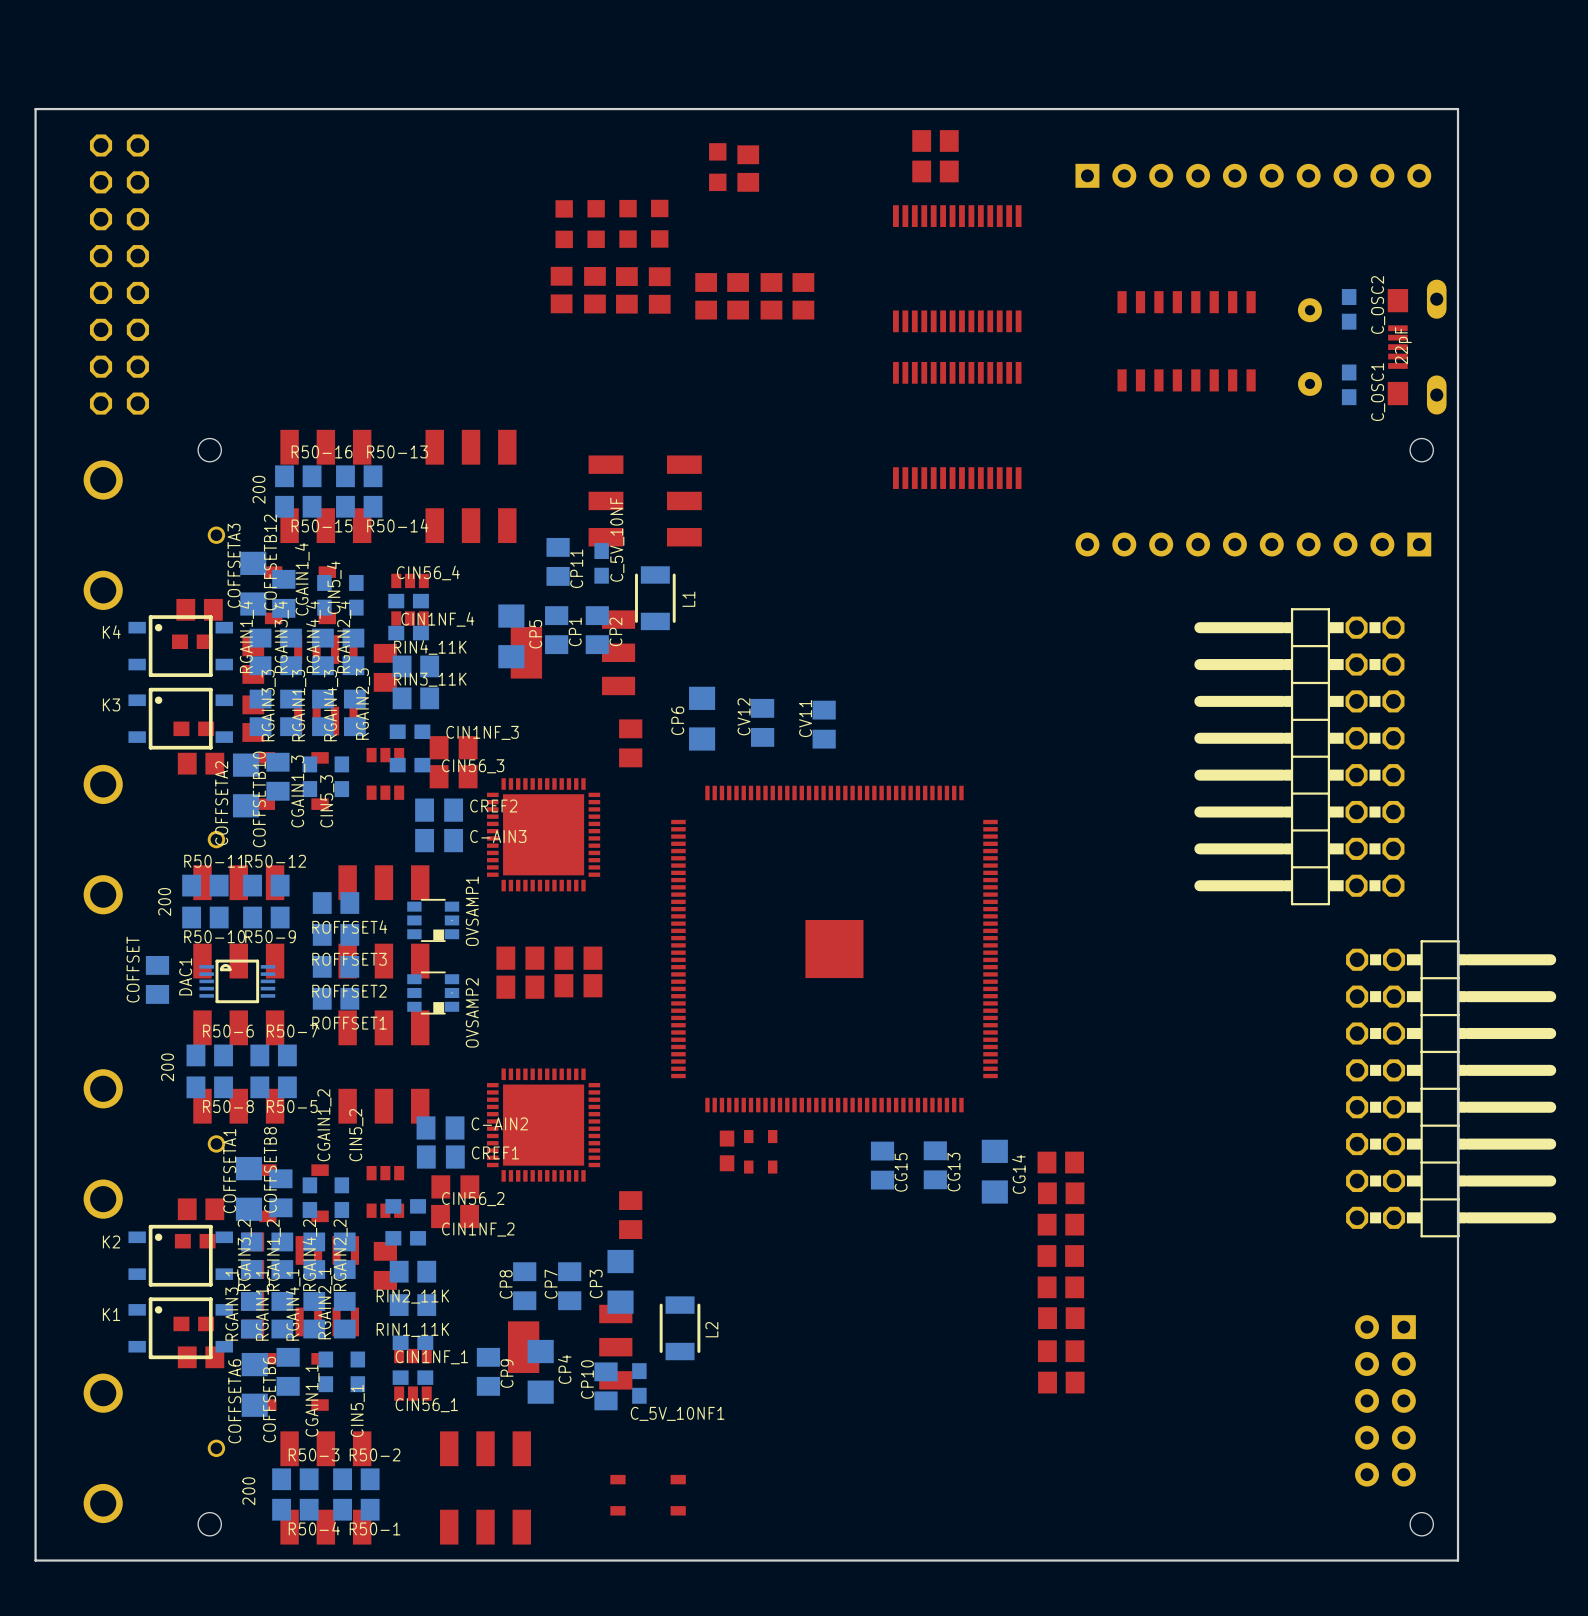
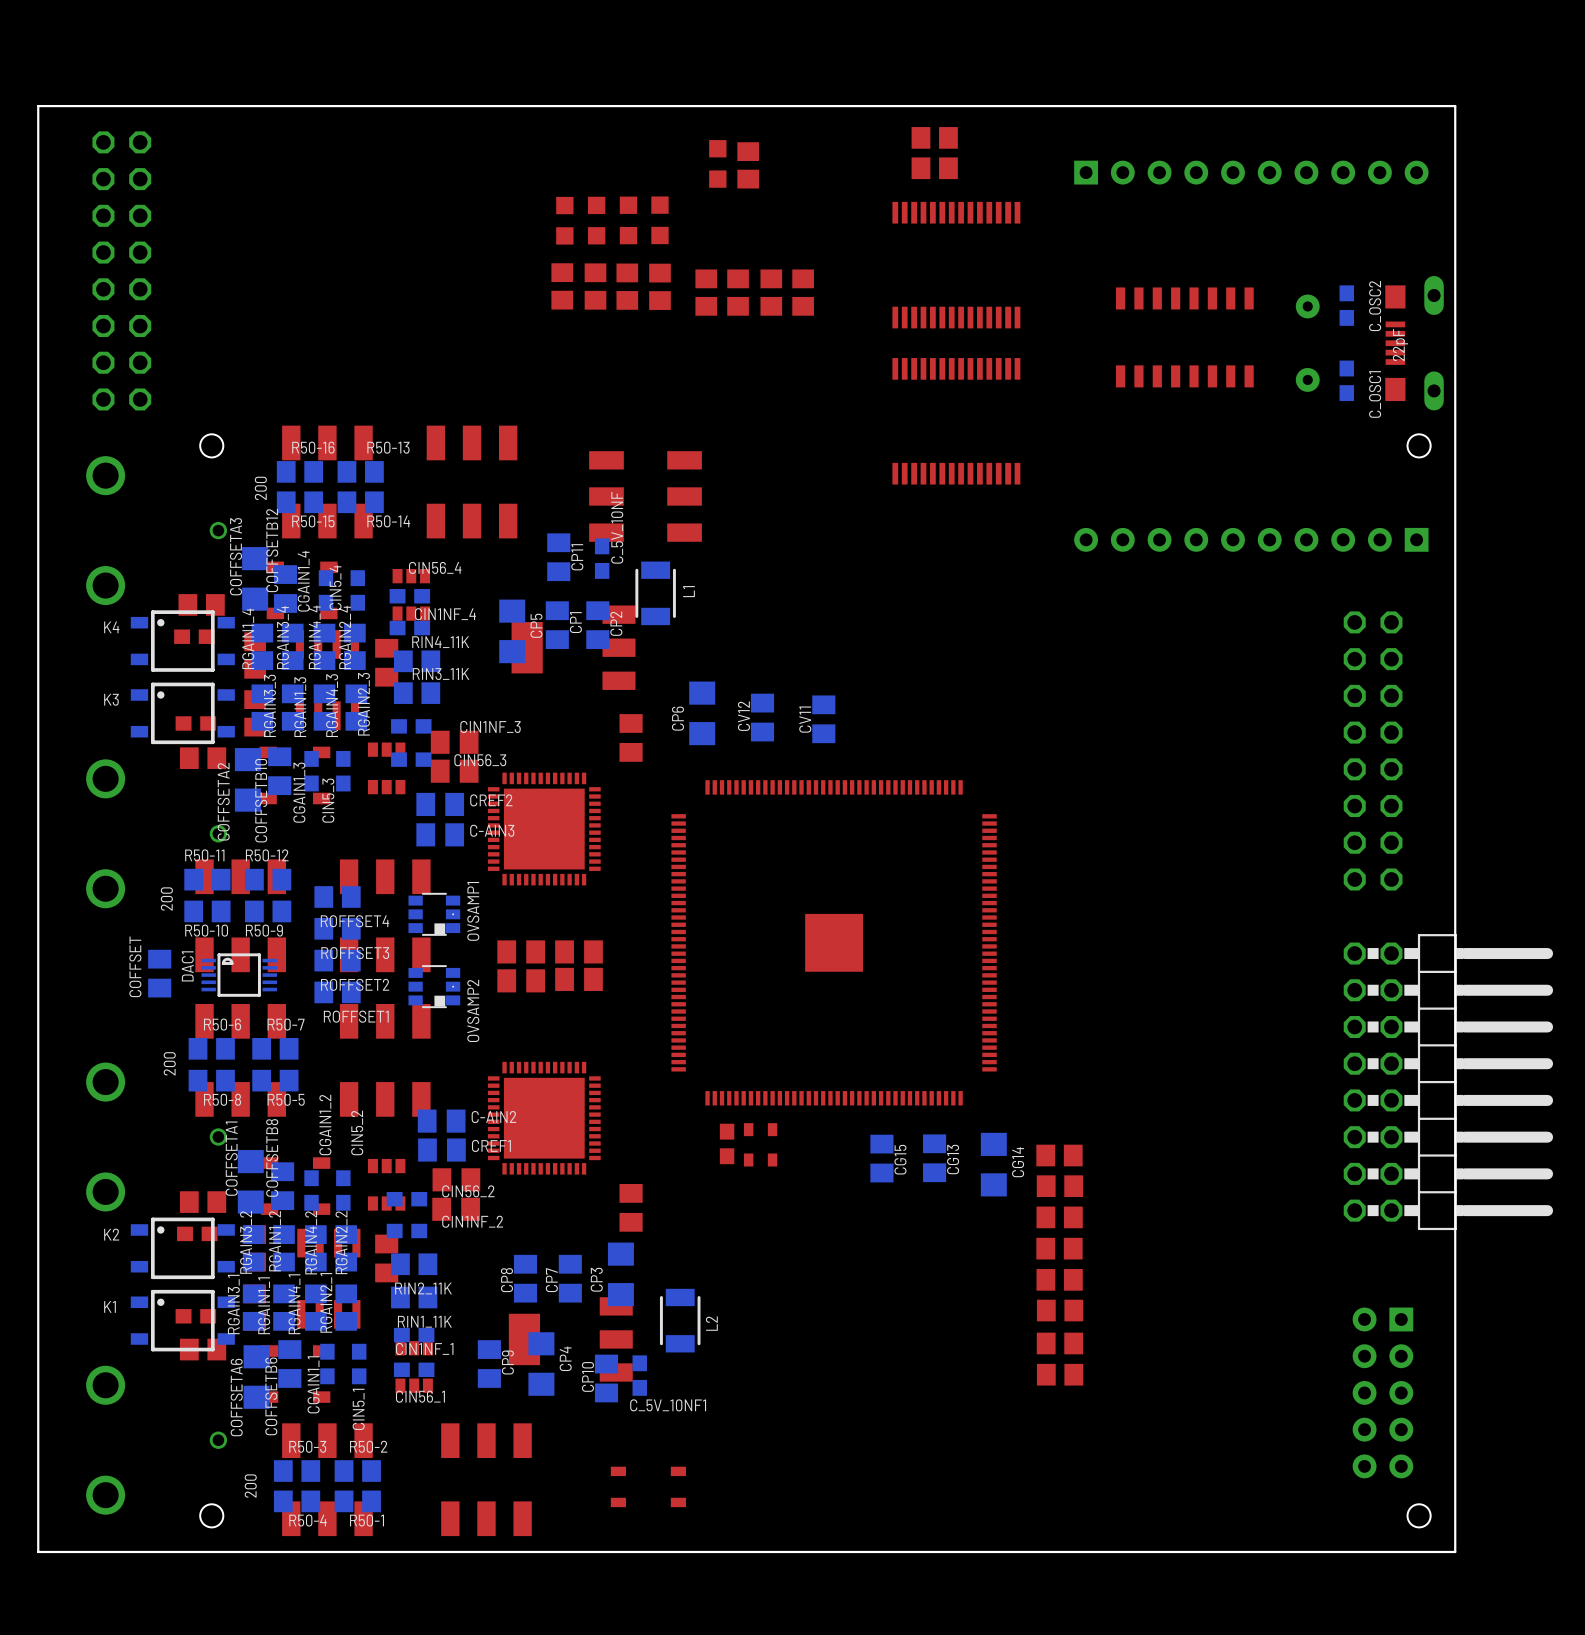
part side: bottom (1299, 756) -> top (1373, 750)

